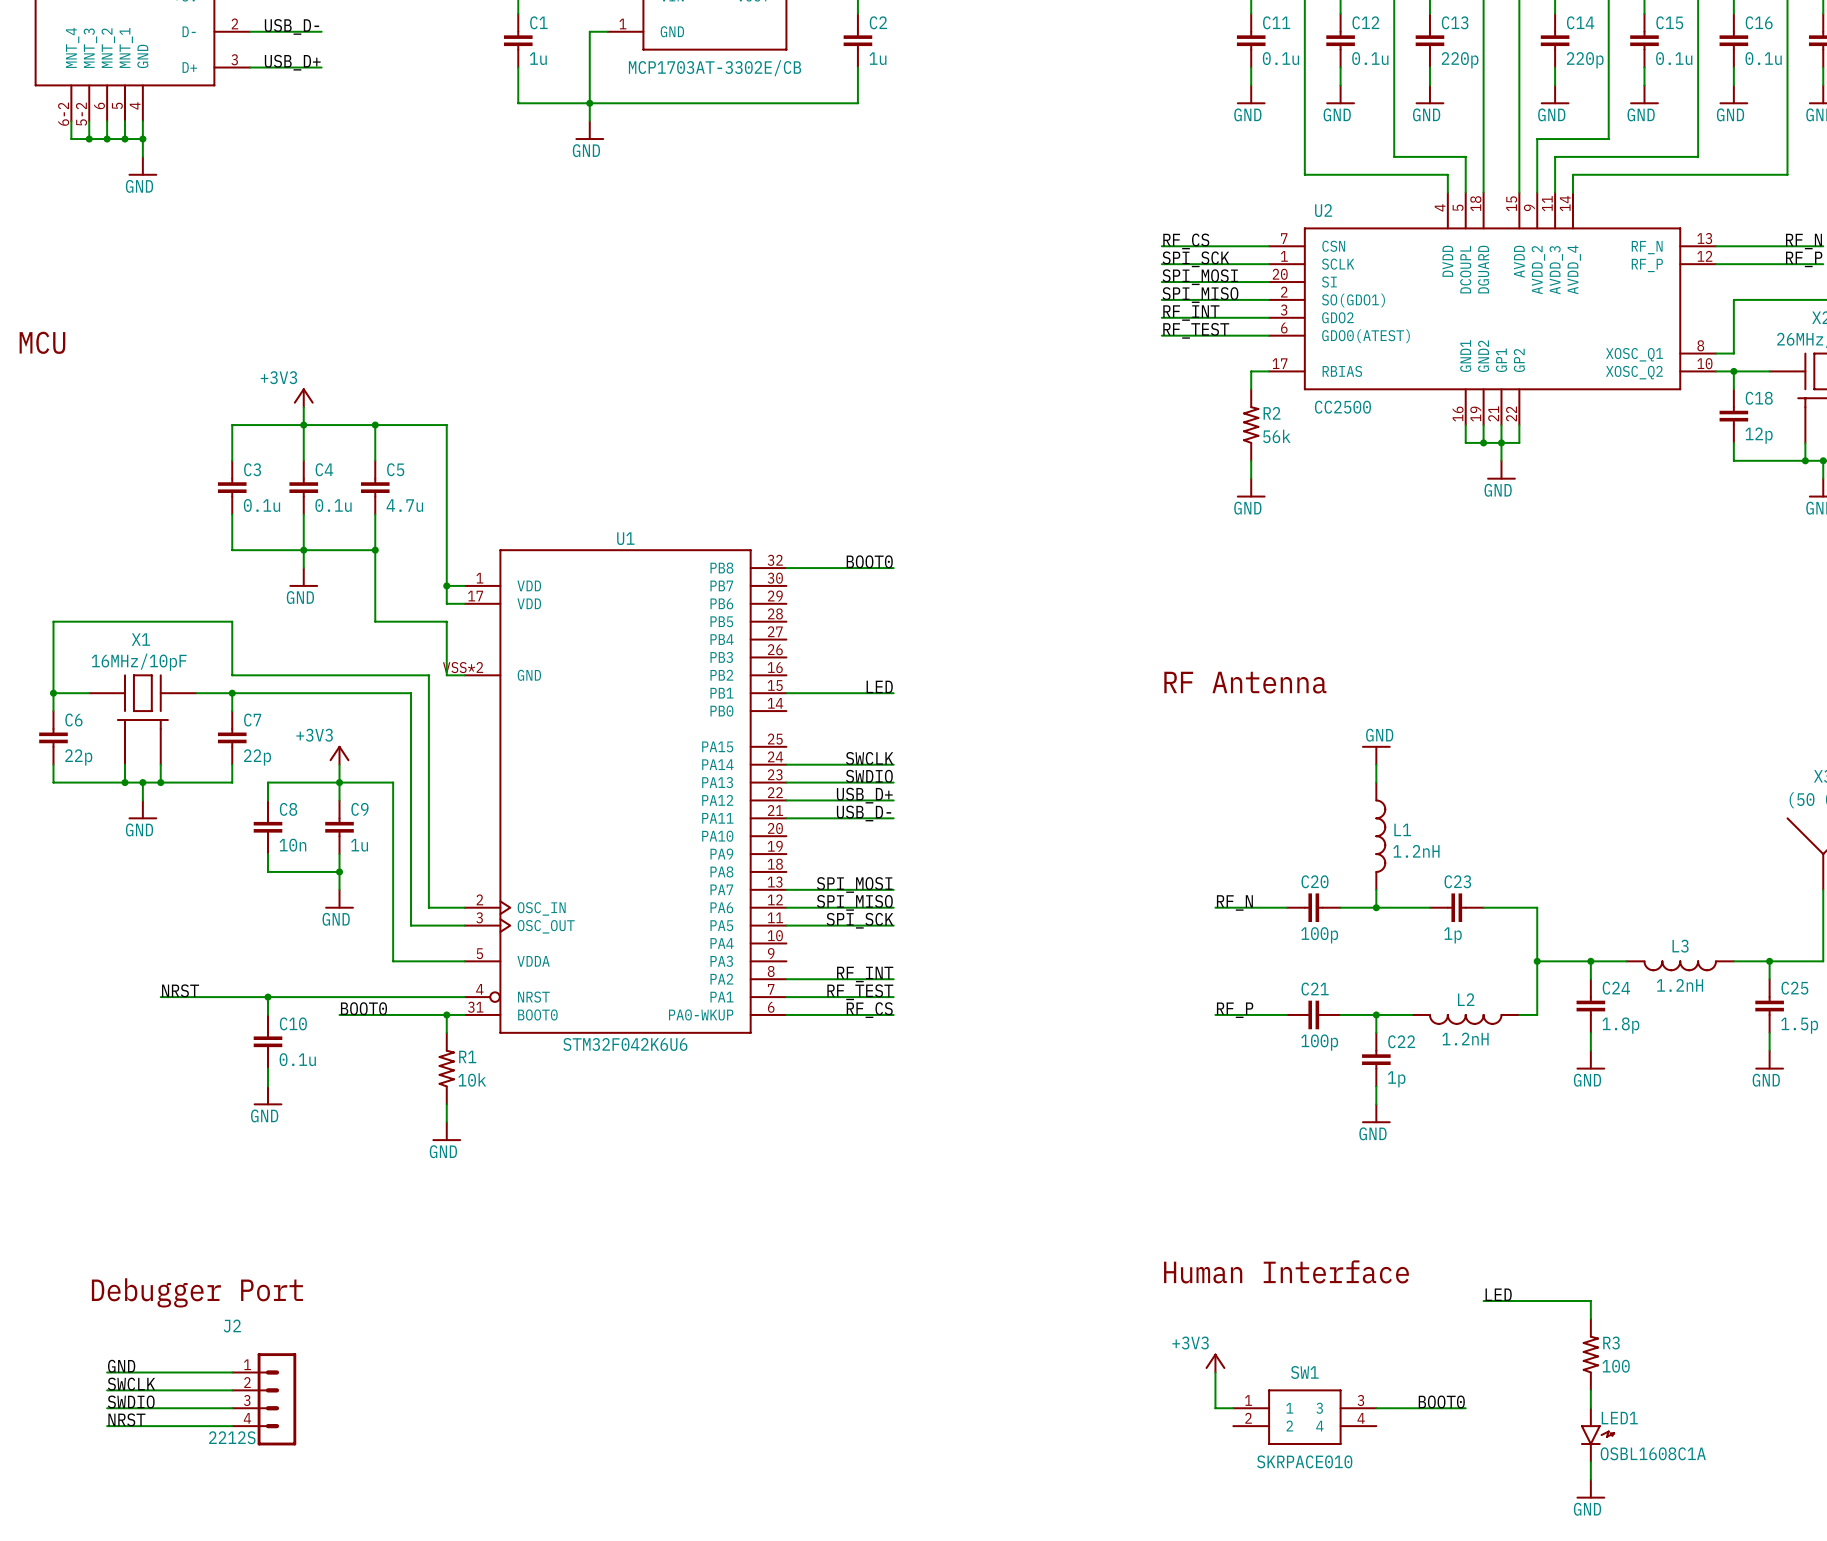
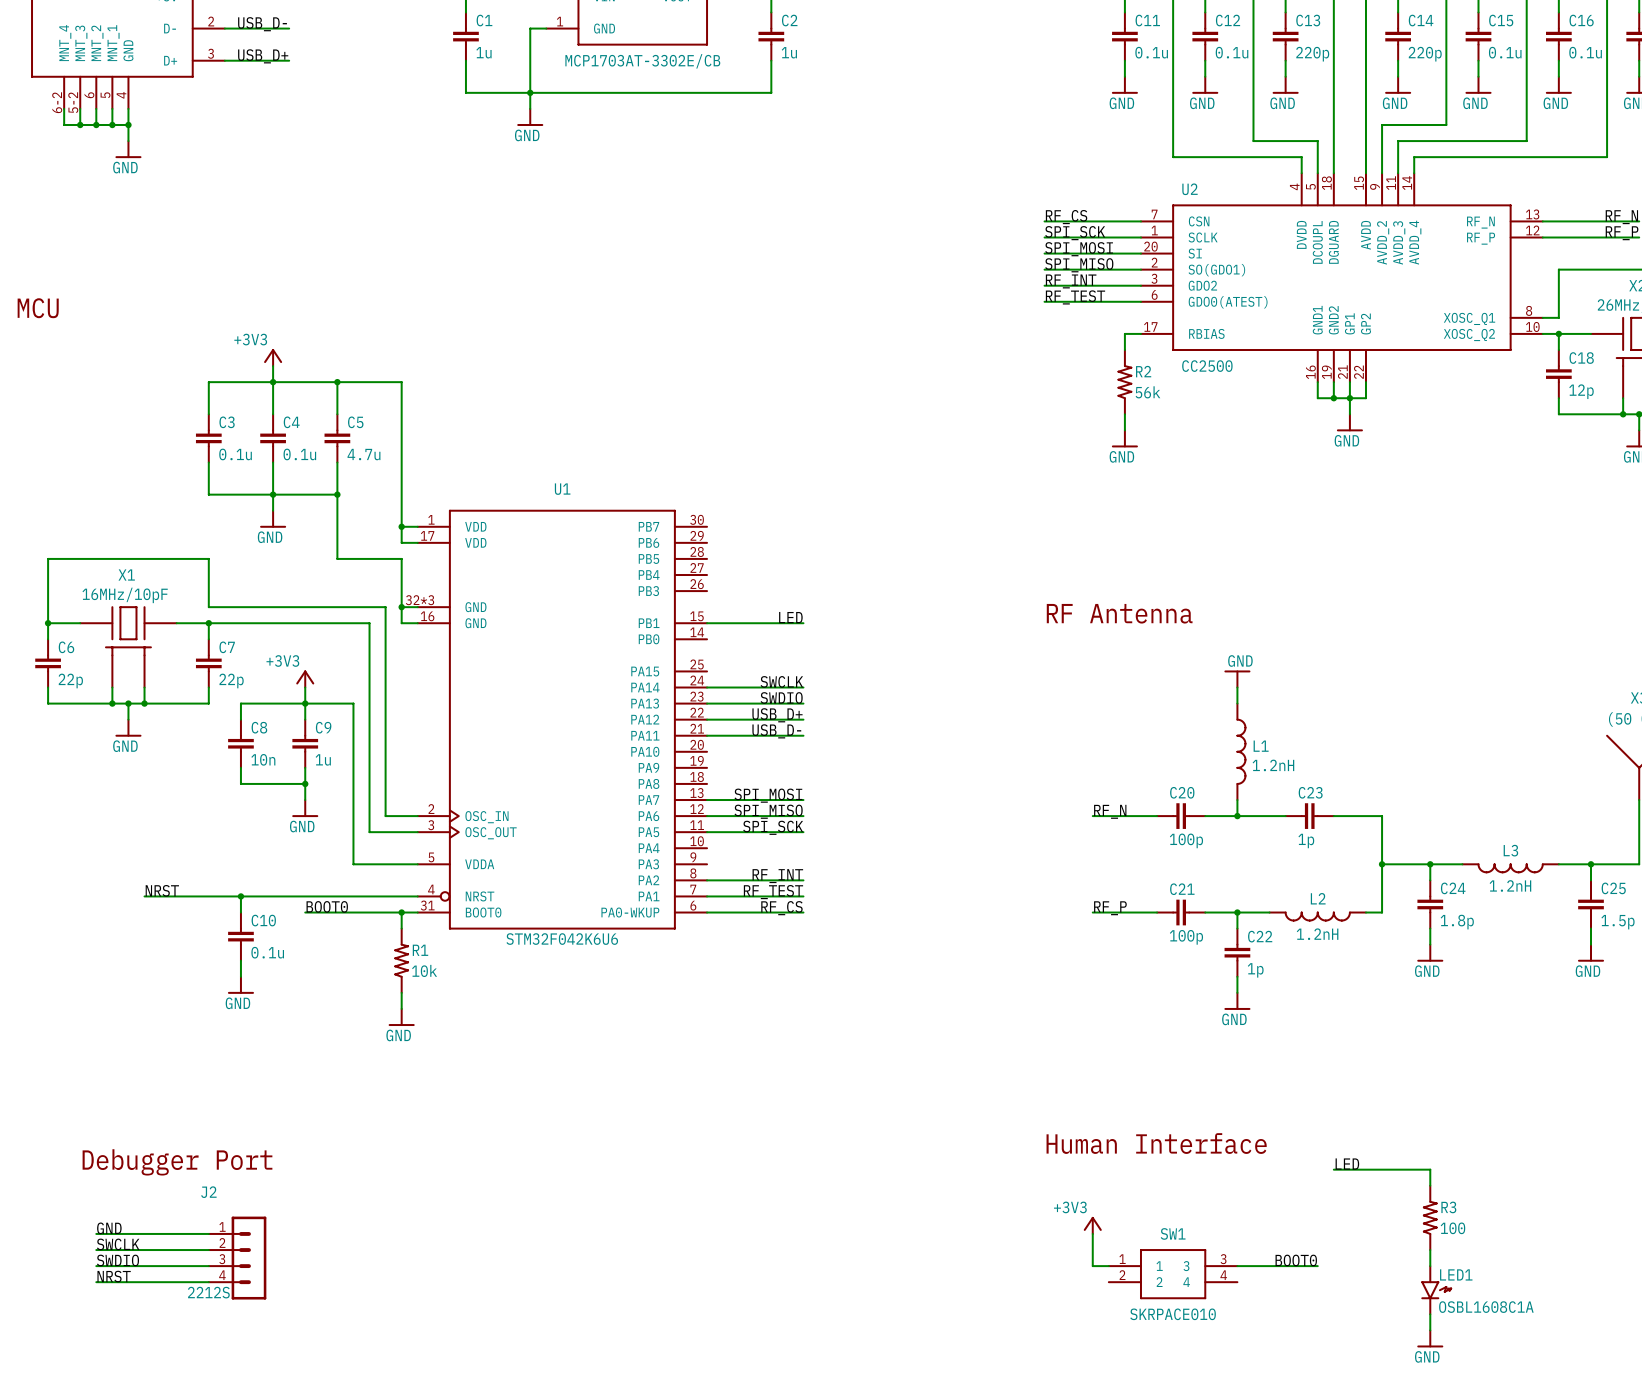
U1 symbol: [464, 549, 787, 1034] -> [417, 509, 708, 930]
label: BOOT0 (869, 561) -> none
wire: (786, 568) (893, 568) -> none
wire: none -> (401, 607) (401, 623) (417, 623)
junction: none -> (401, 607)

